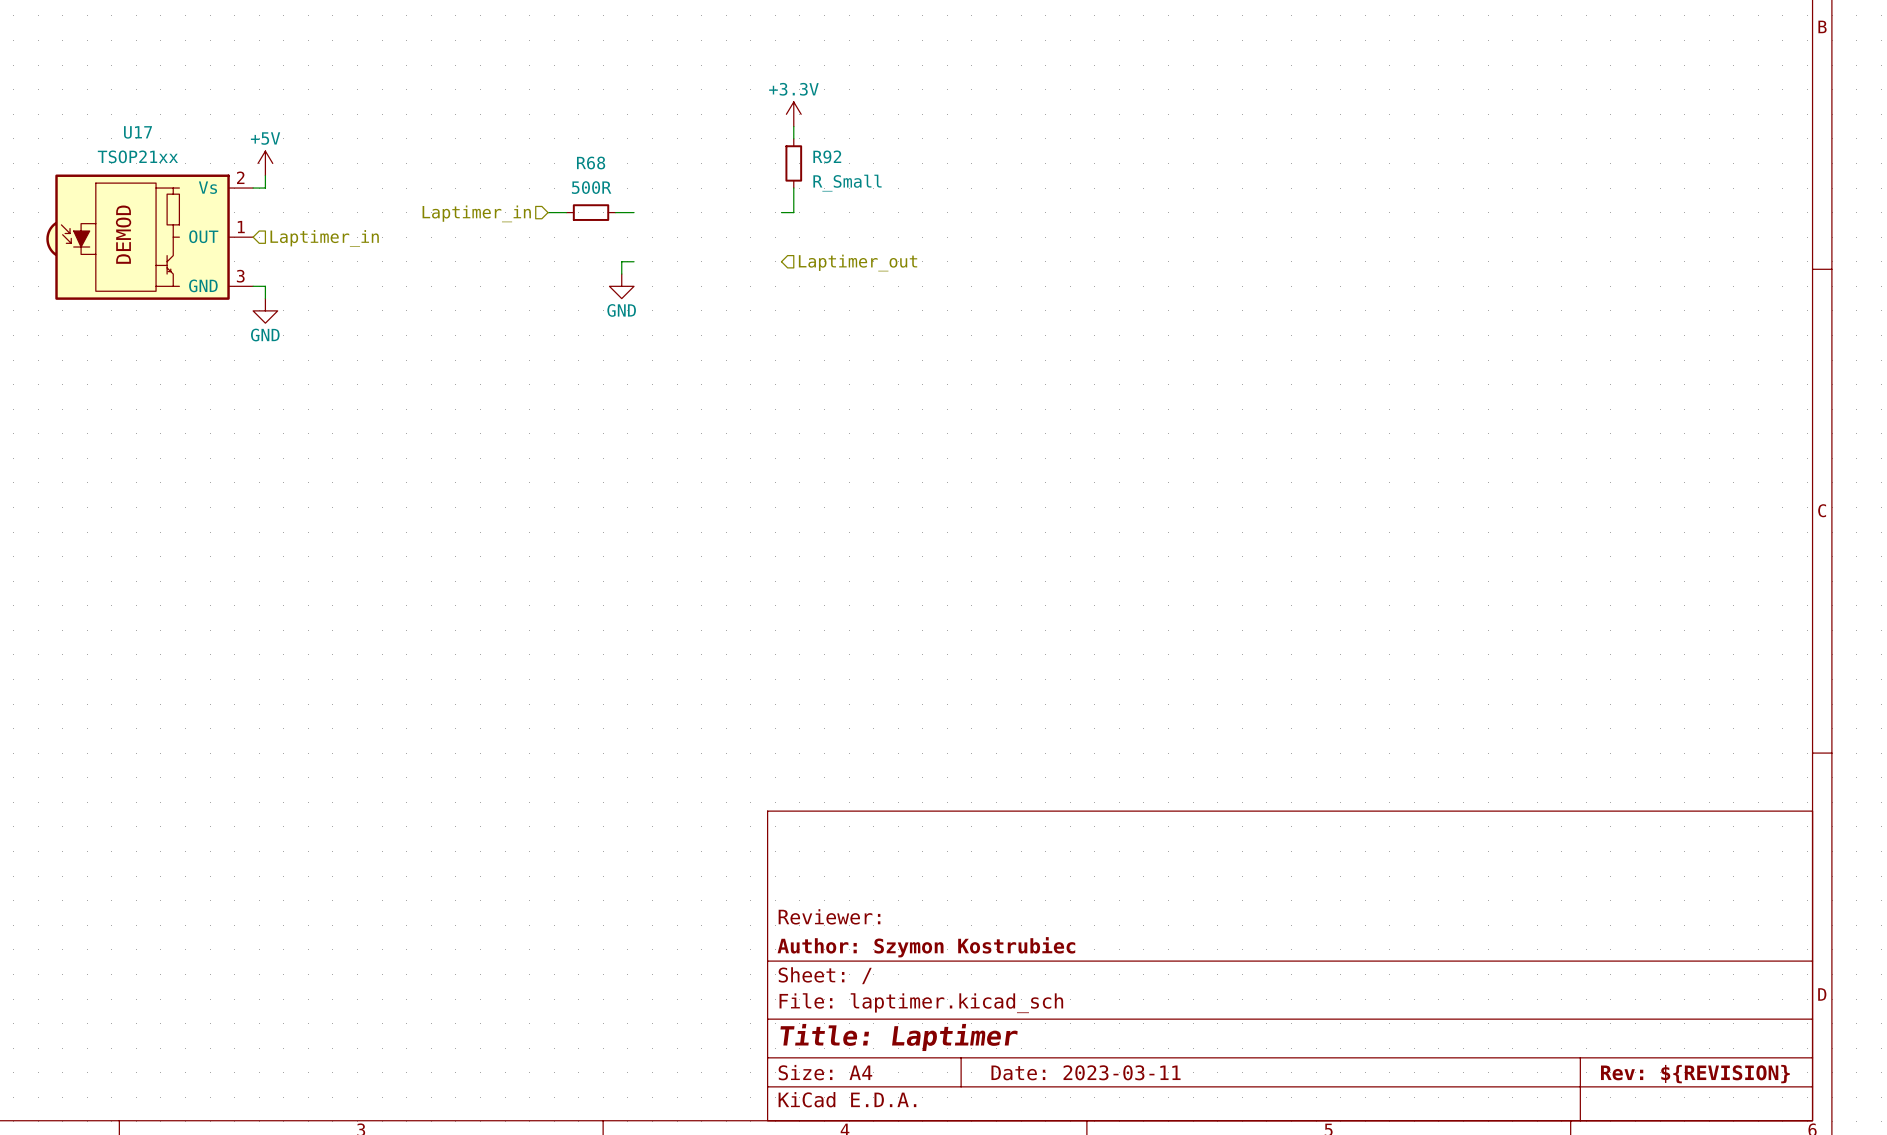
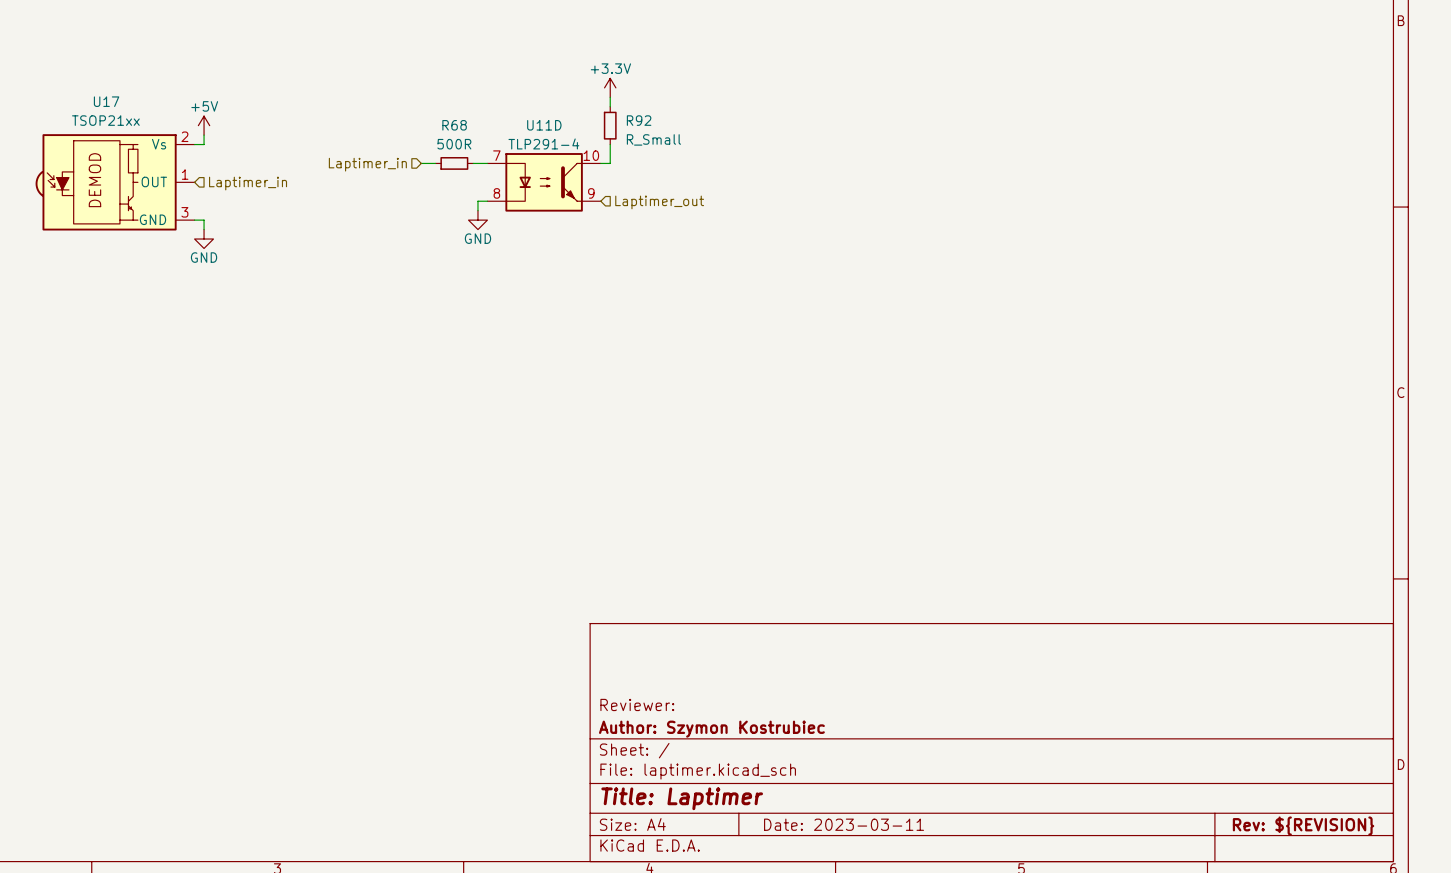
U11D: none -> TLP291-4 (544, 182)

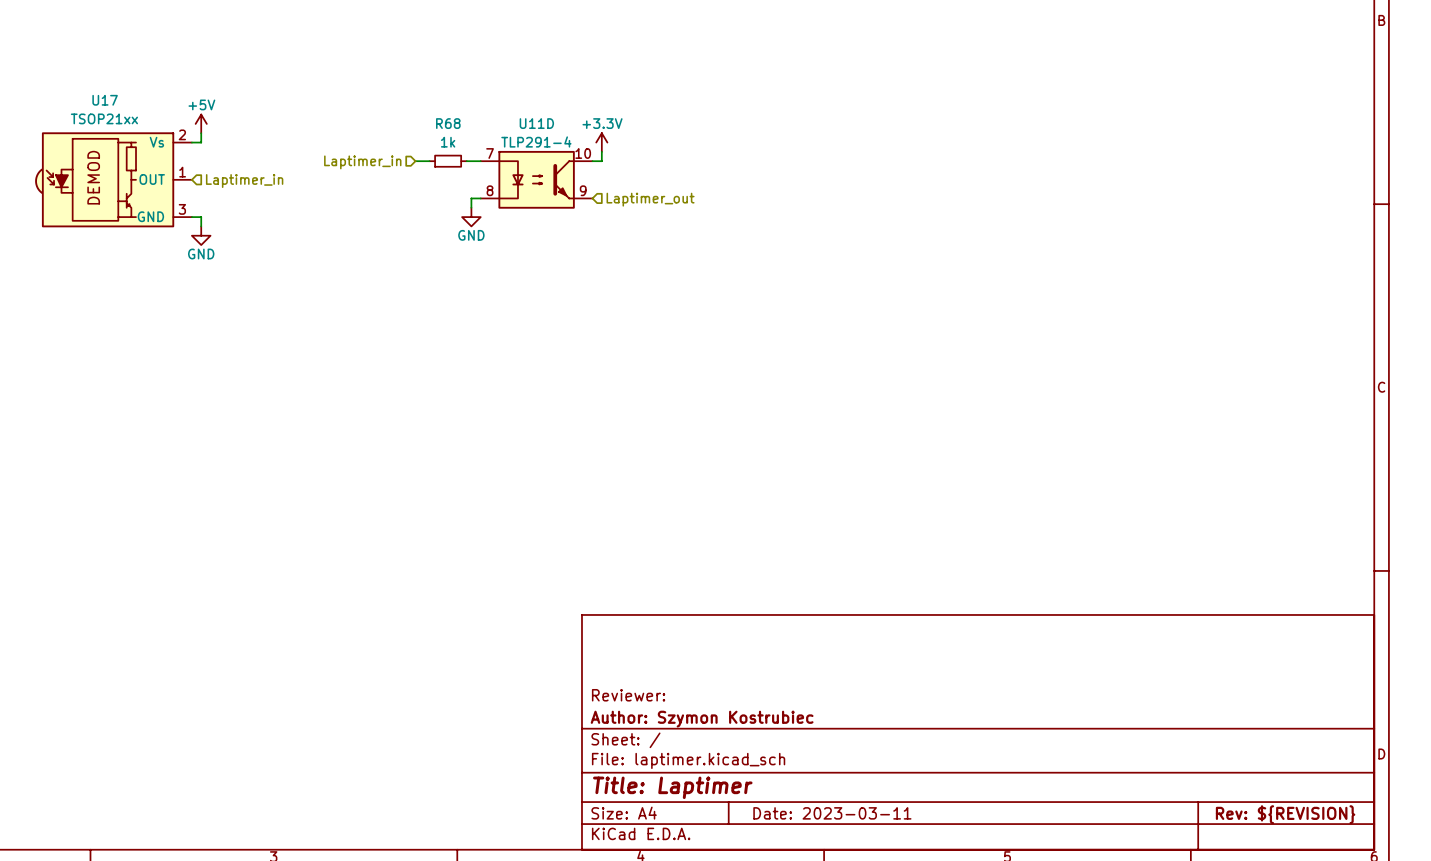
power symbol position: +3.3V (610, 87) -> +3.3V (601, 142)
wire: (610, 97) (610, 106) -> none
R92: R_Small (610, 125) -> none
R68 value: 500R (454, 144) -> 1k (448, 142)

